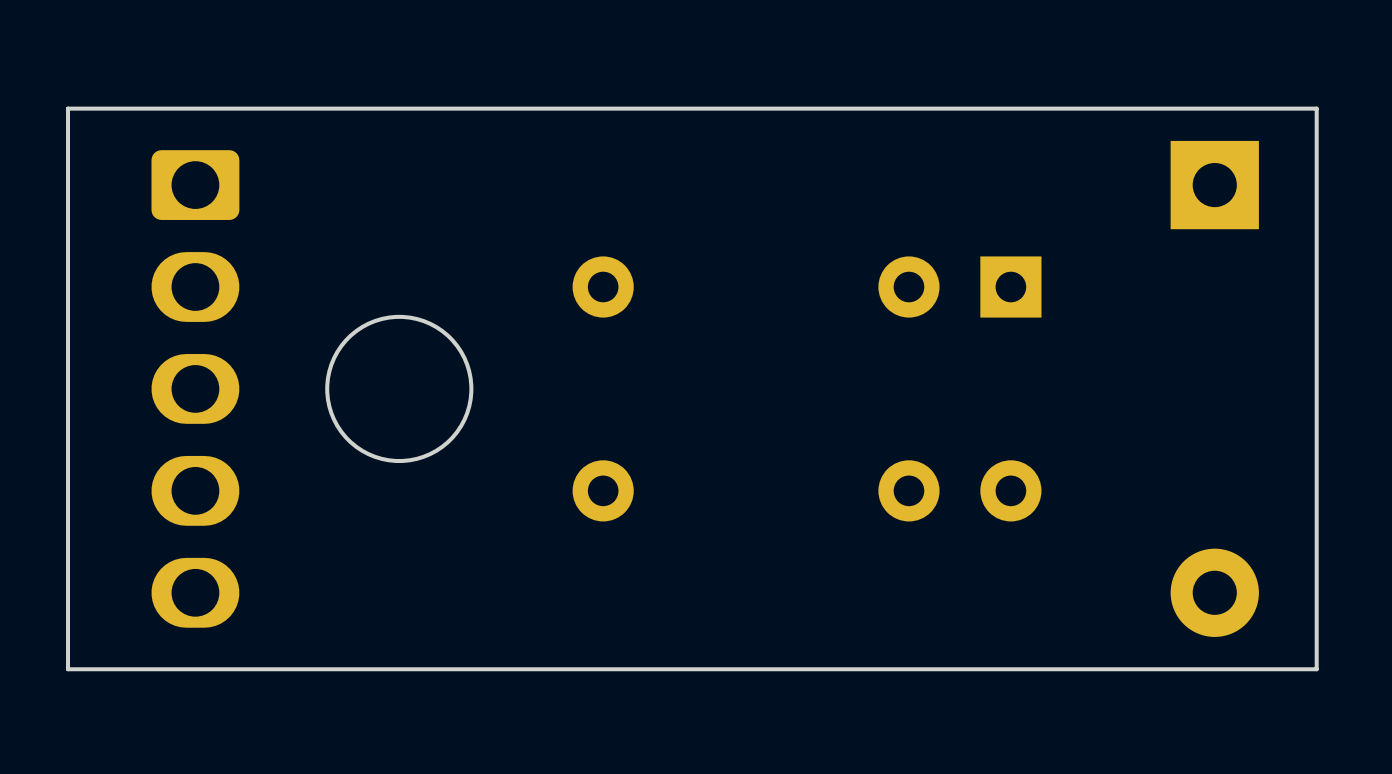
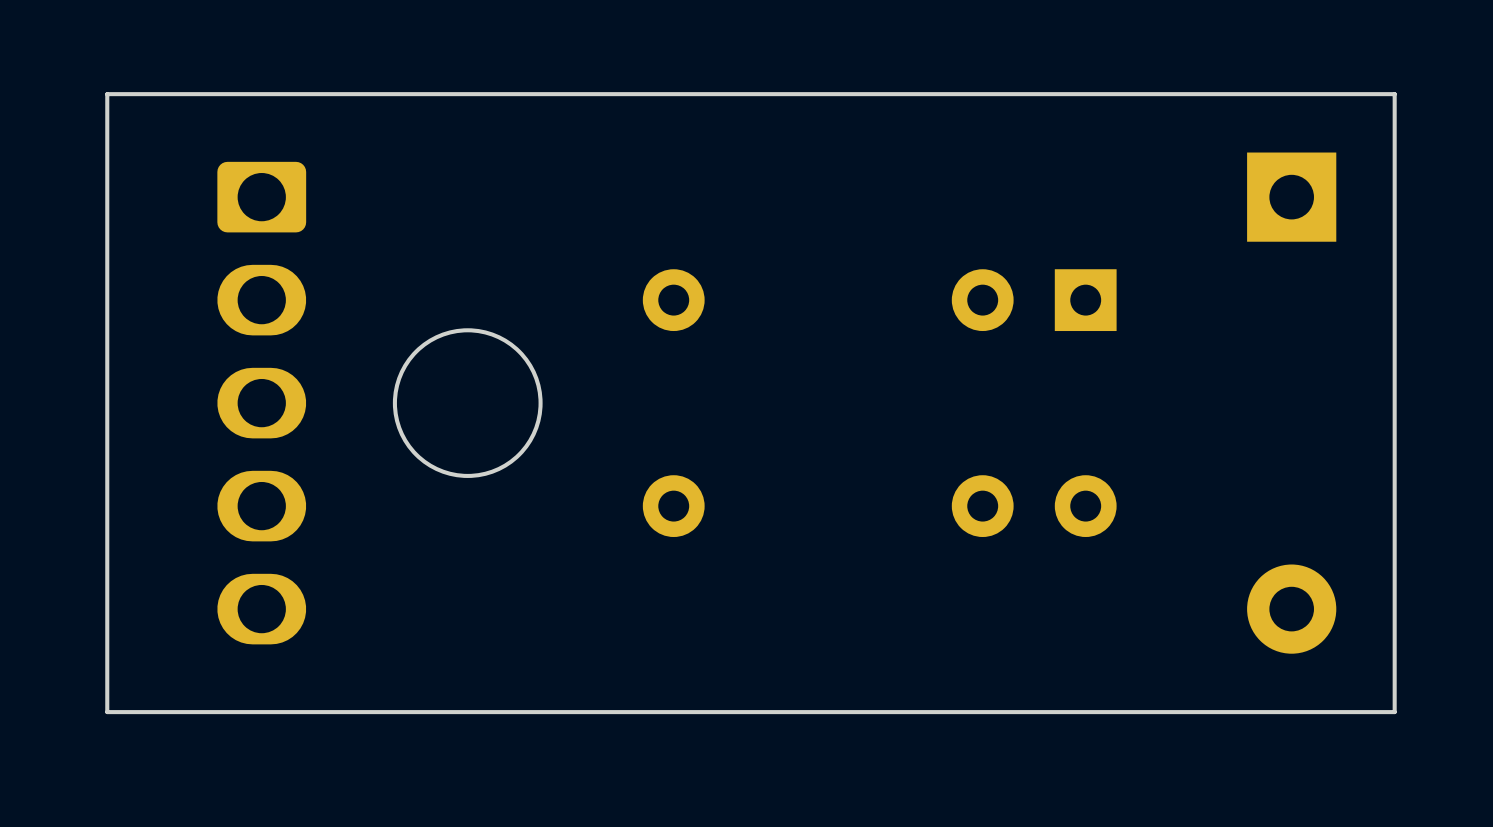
board edge: (1316, 108) (68, 108) (68, 669) (1316, 669) -> (1394, 119) (1394, 94) (107, 94) (107, 712) (1394, 712) (1394, 686)

